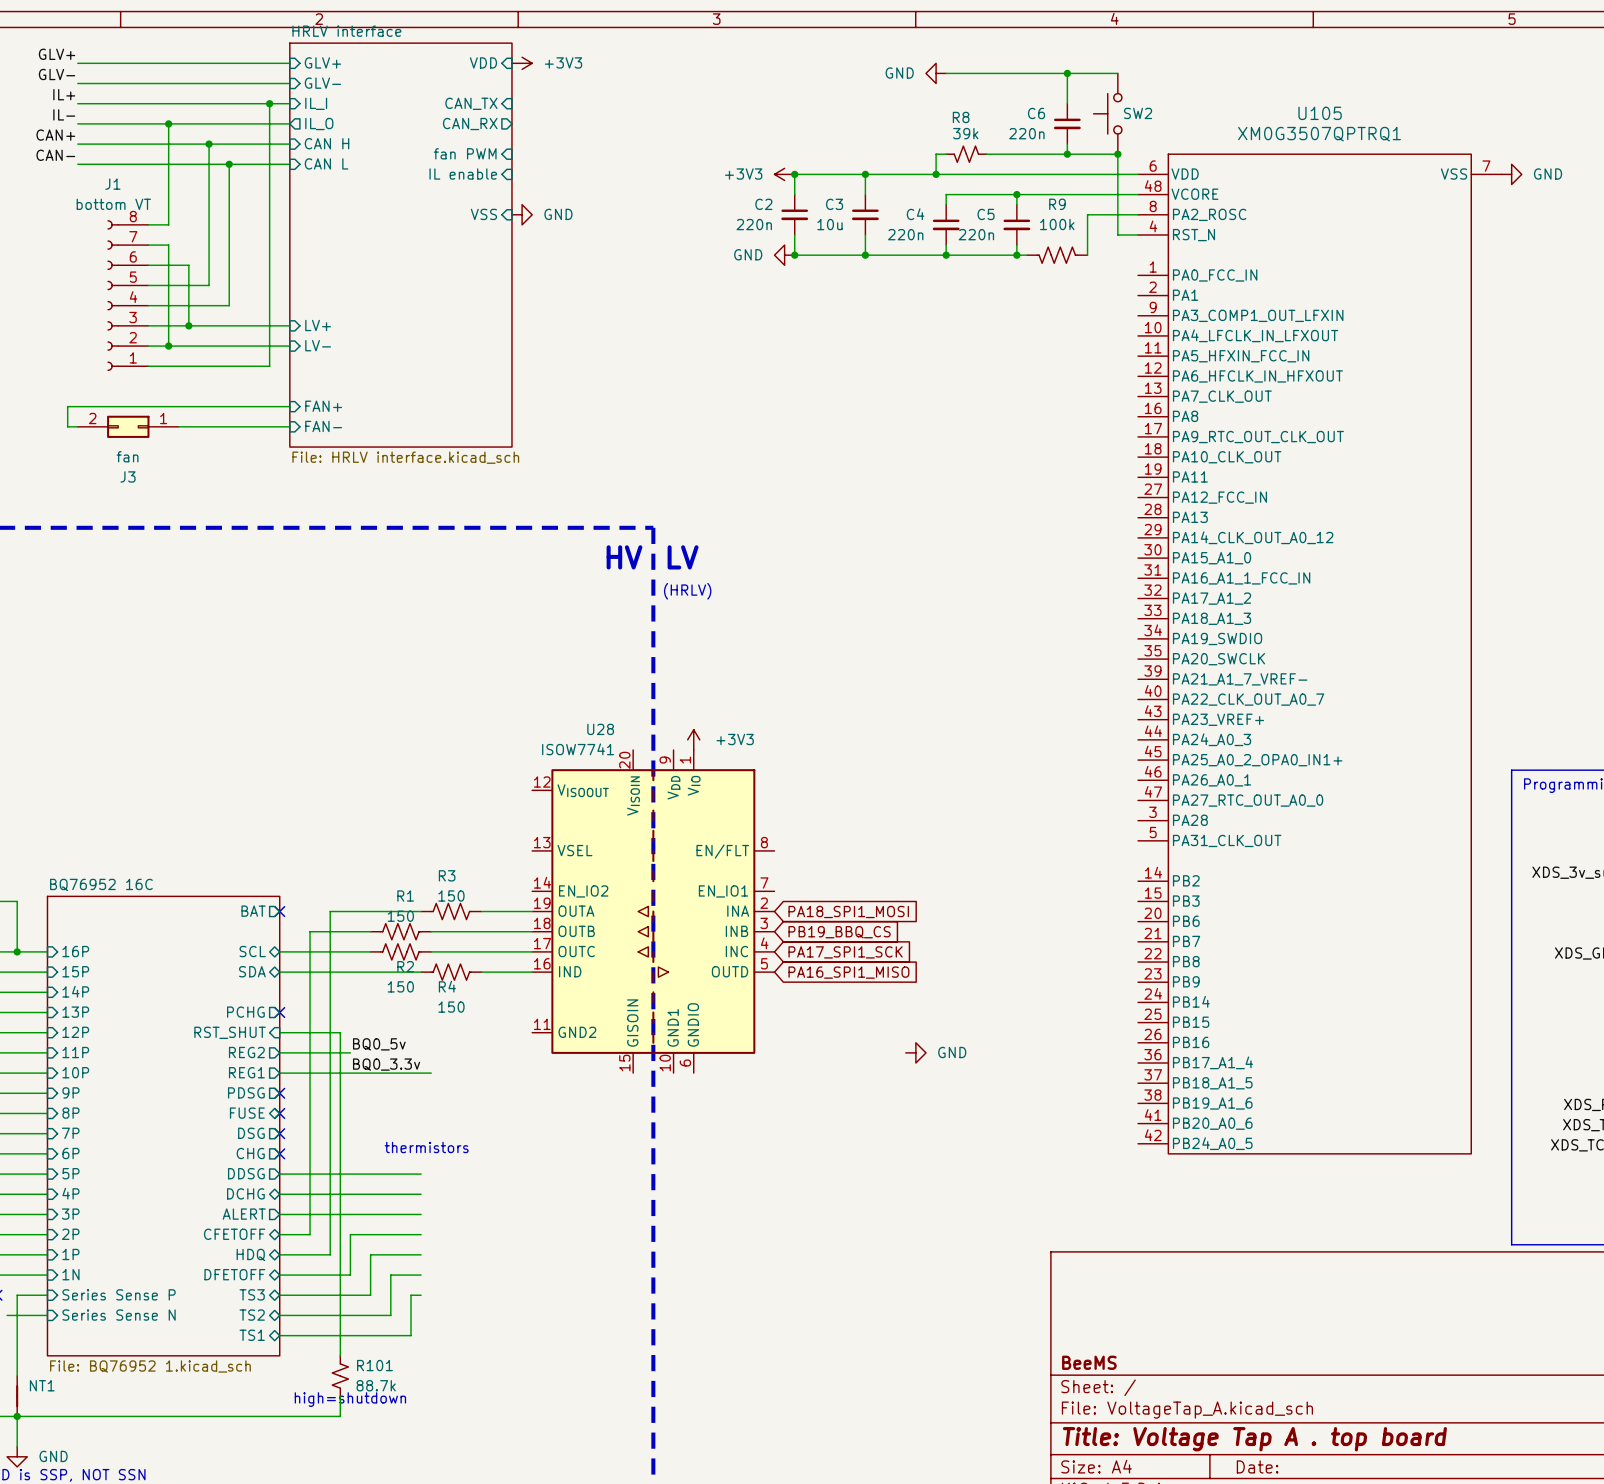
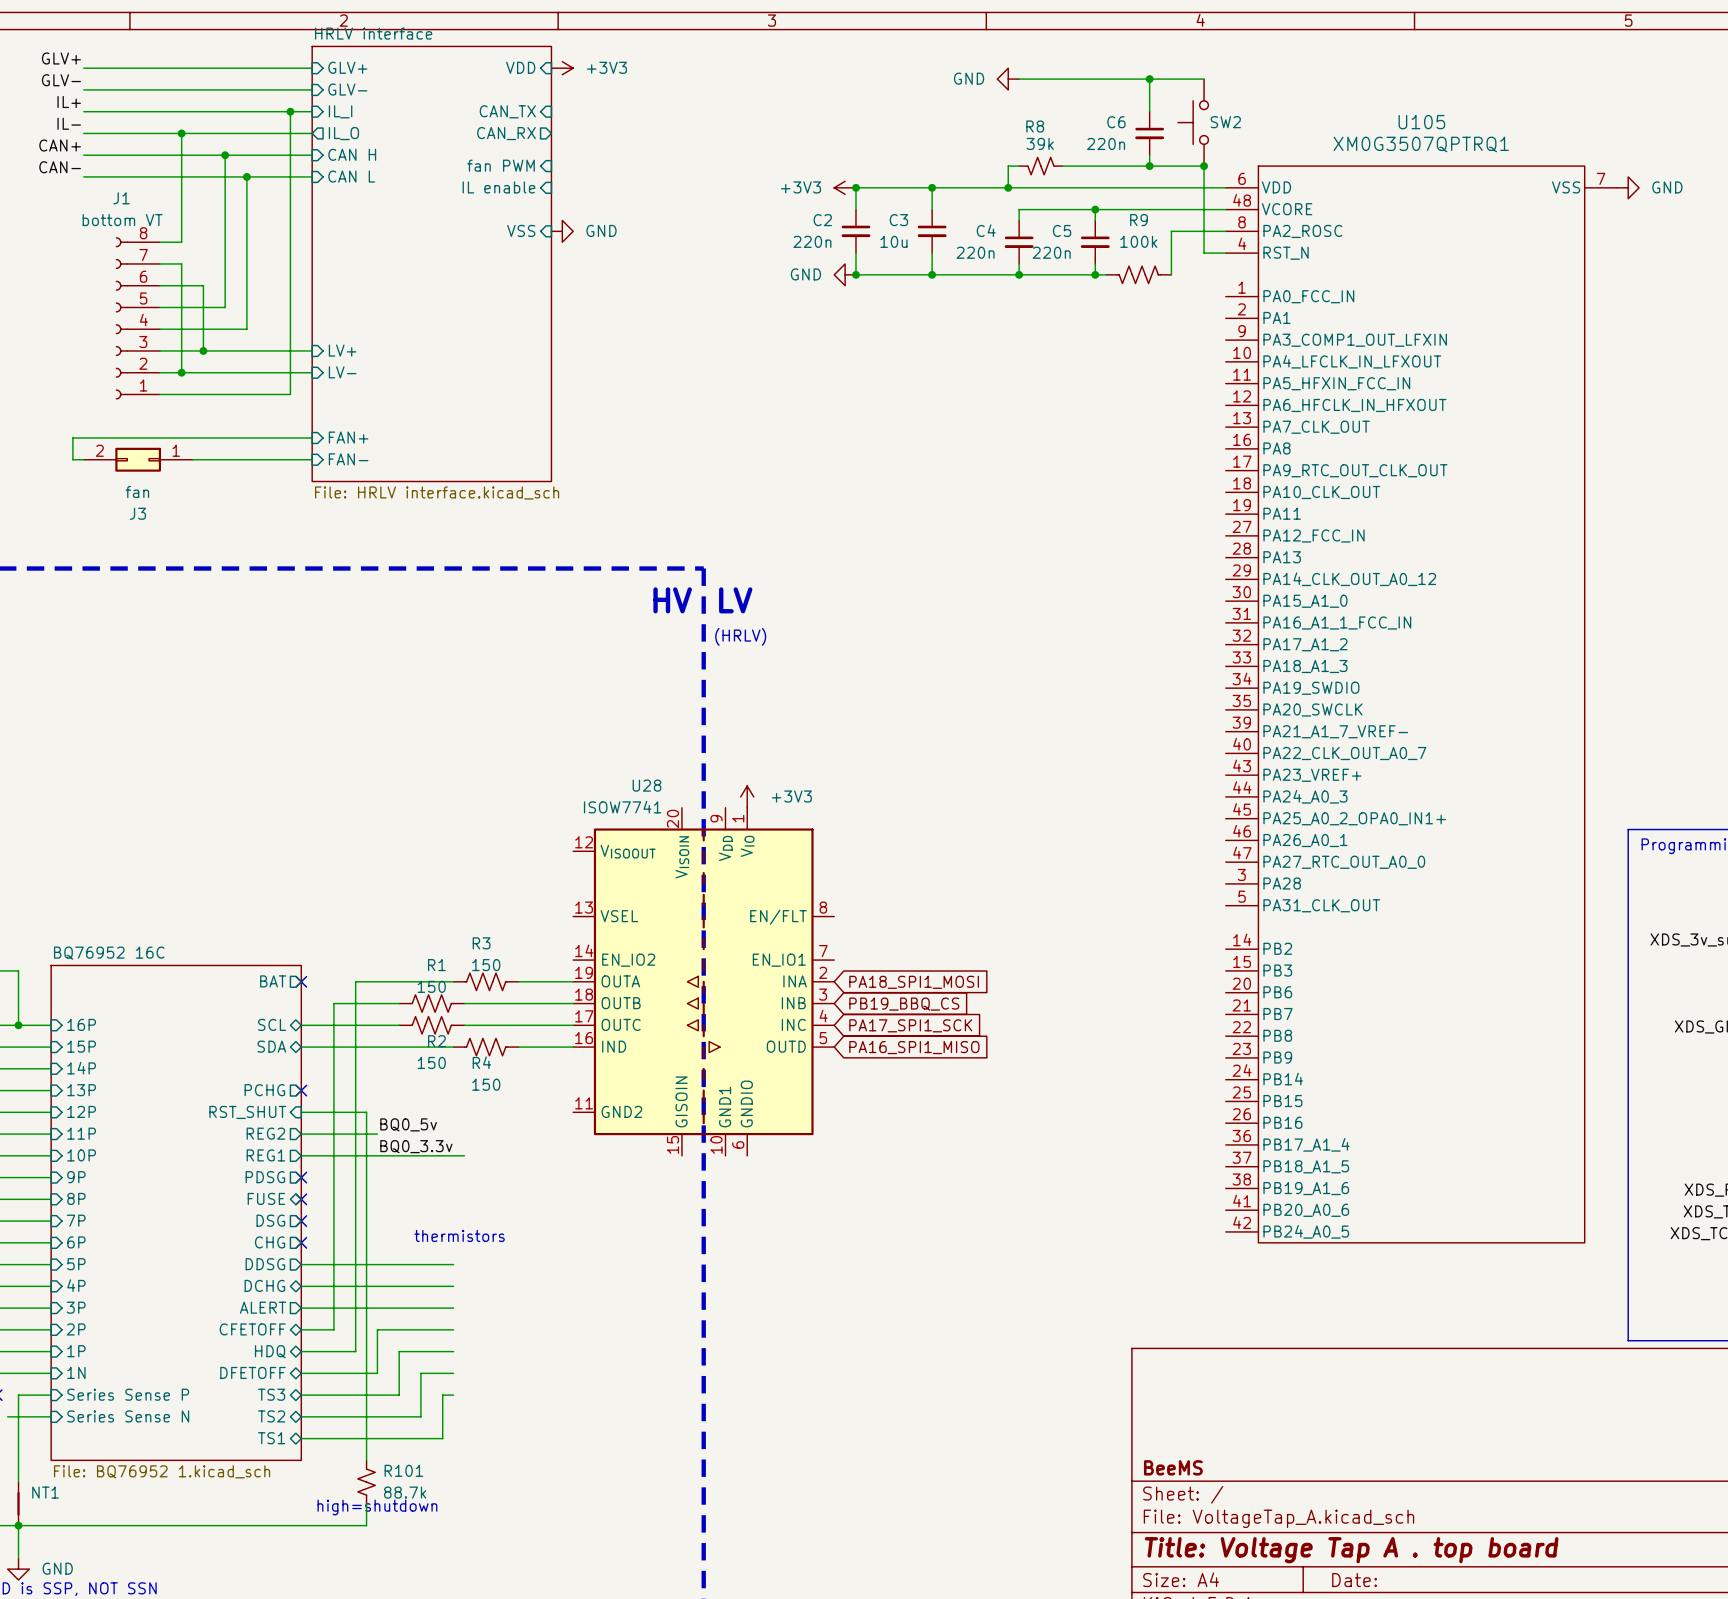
power symbol: GND (915, 1052) -> none

